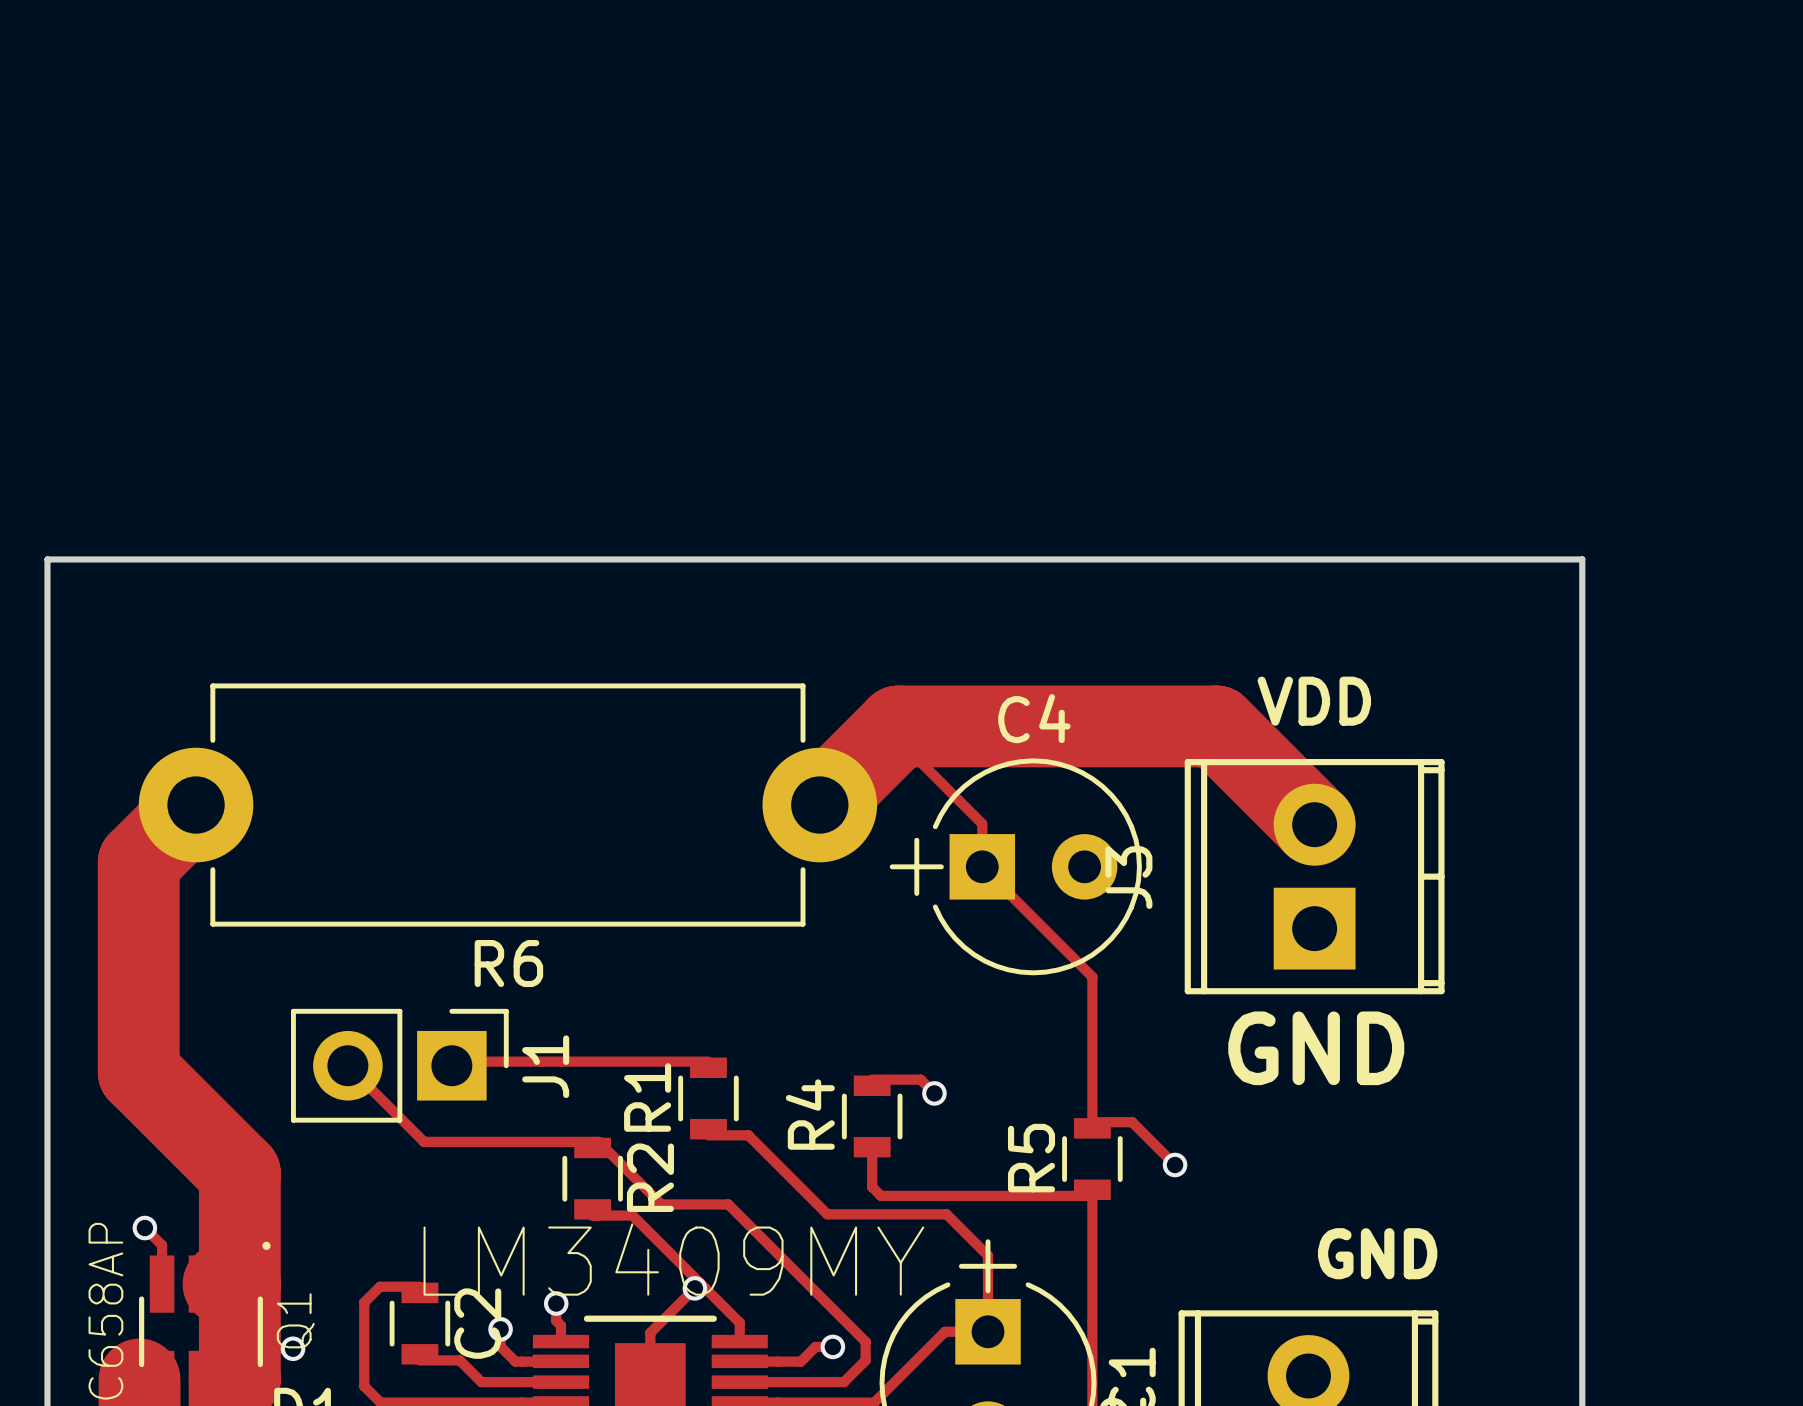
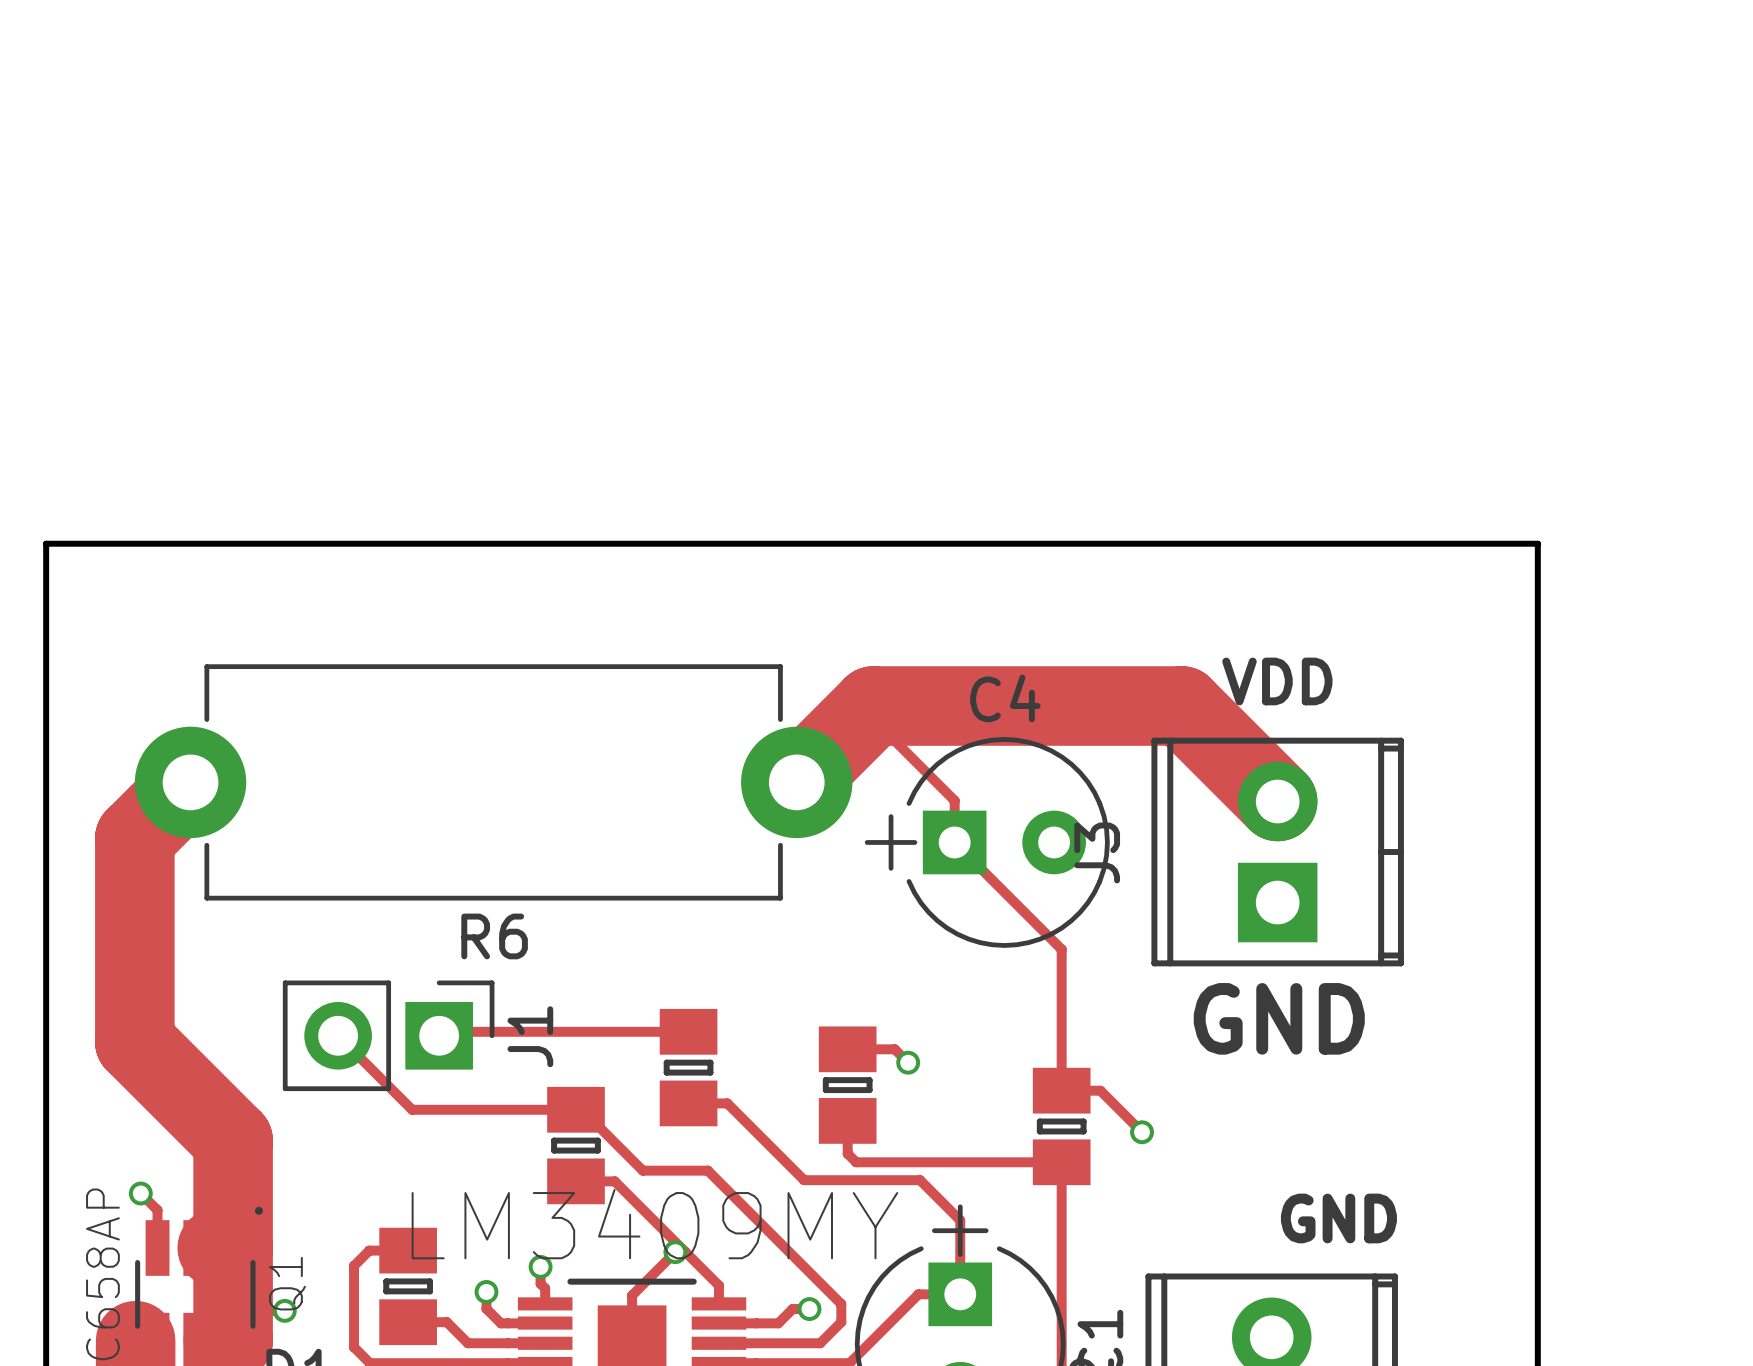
R1: (708, 1098) -> none
part: none -> (688, 1067)
R4: (872, 1116) -> none
part: none -> (847, 1085)
R5: (1092, 1159) -> none
part: none -> (1061, 1126)
R2: (592, 1178) -> none
part: none -> (575, 1145)
C2: (419, 1323) -> none
part: none -> (408, 1286)

